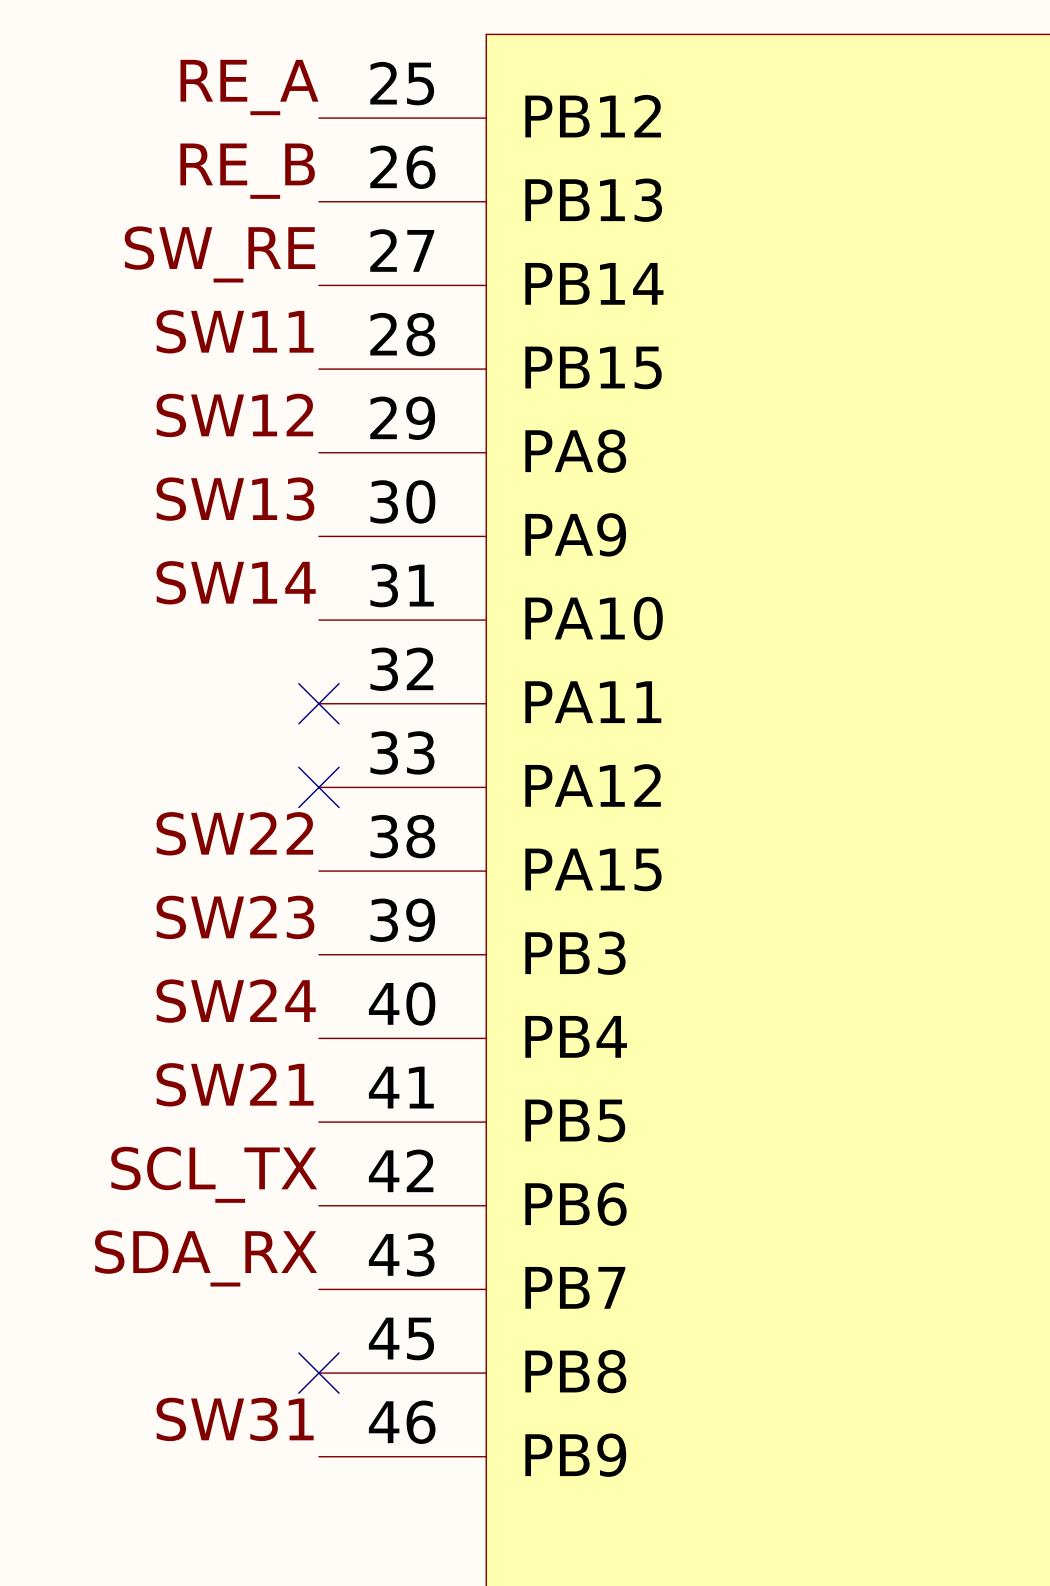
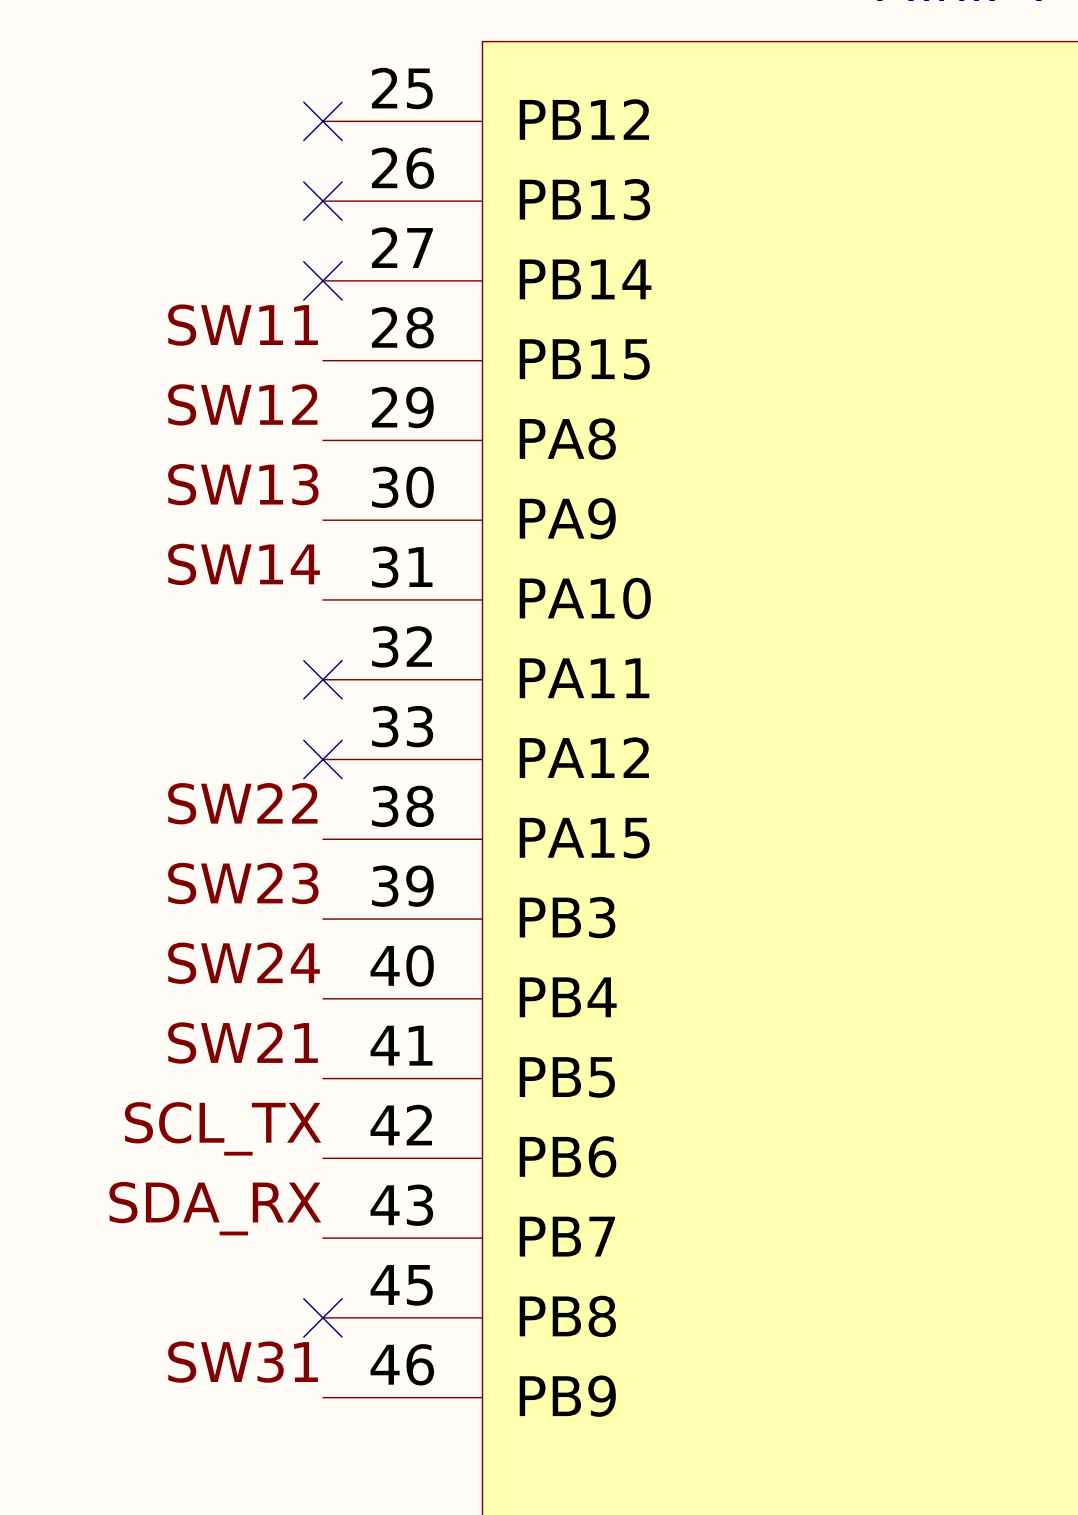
label: RE_A (249, 87) -> none
no-connect mark: none -> (322, 121)
label: RE_B (247, 171) -> none
no-connect mark: none -> (322, 201)
label: SW_RE (220, 254) -> none
no-connect mark: none -> (322, 280)

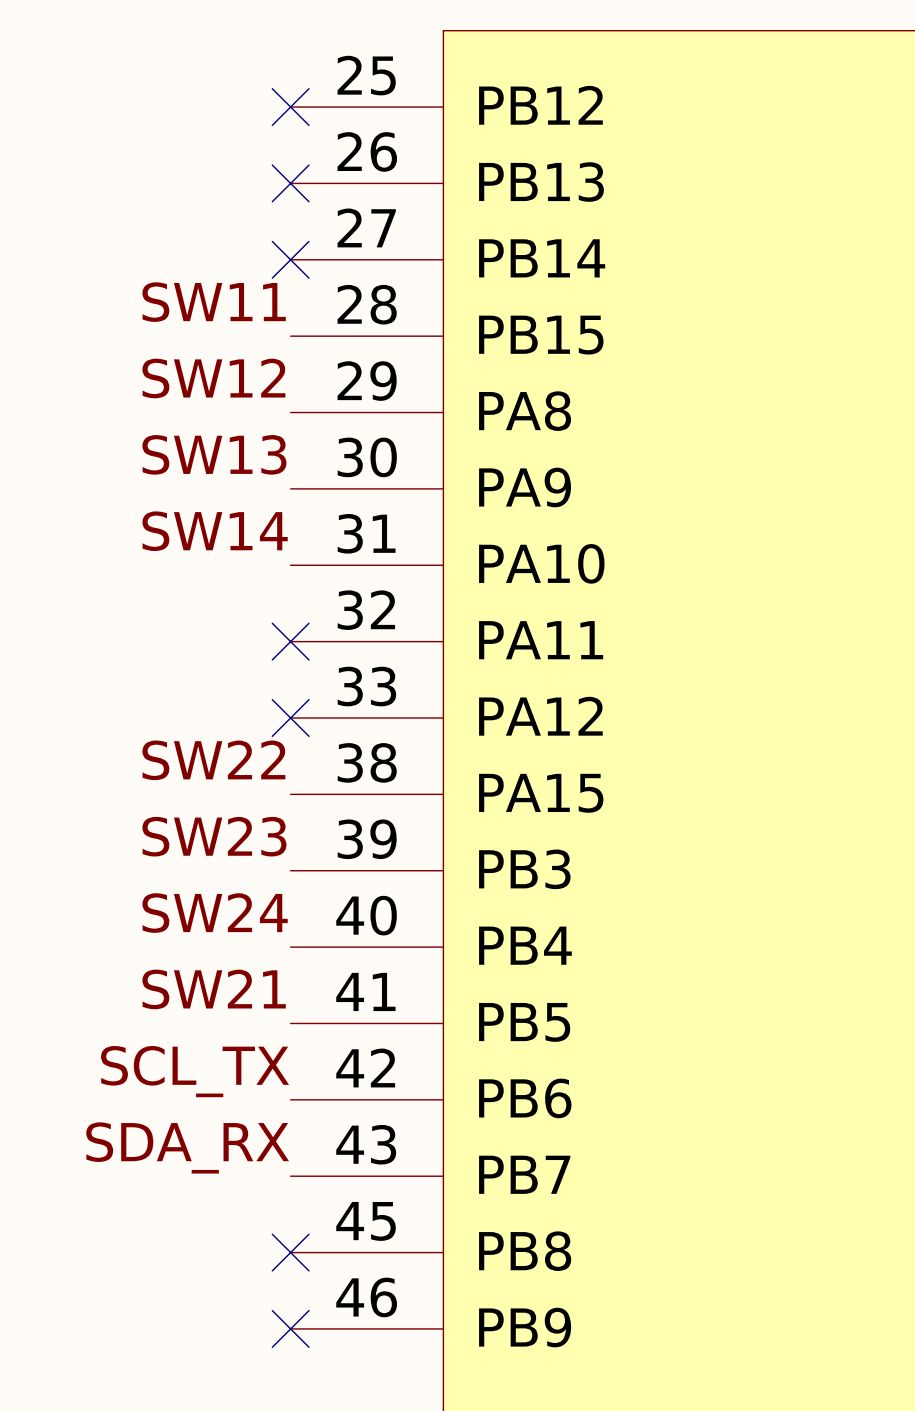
label: SW31 (243, 1362) -> none
no-connect mark: none -> (290, 1328)

